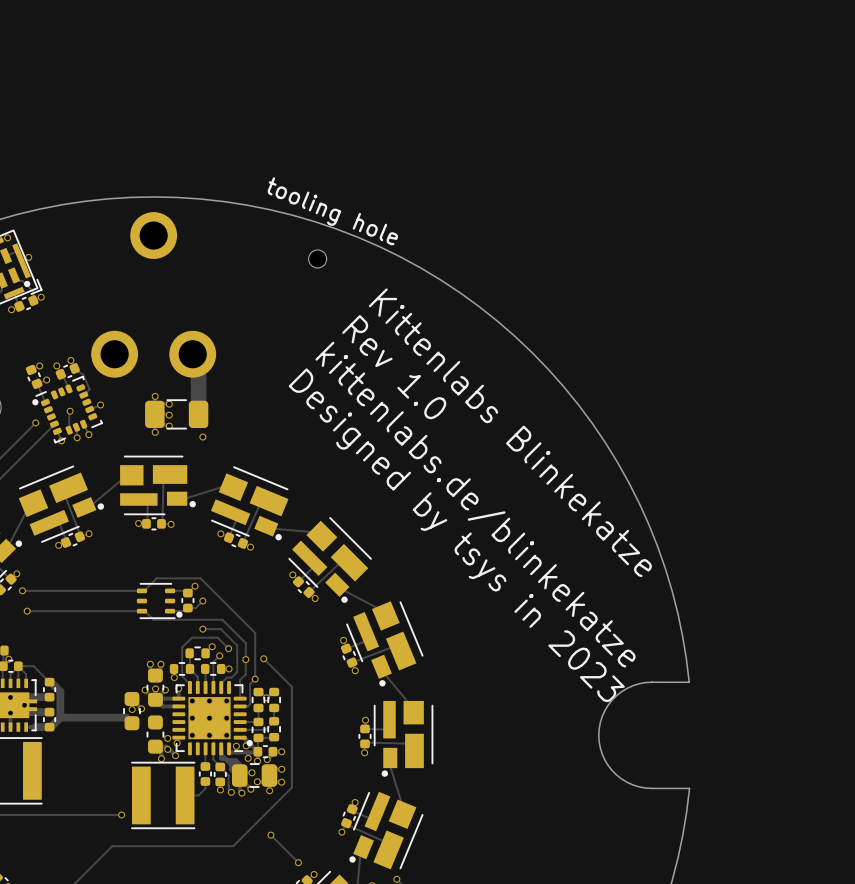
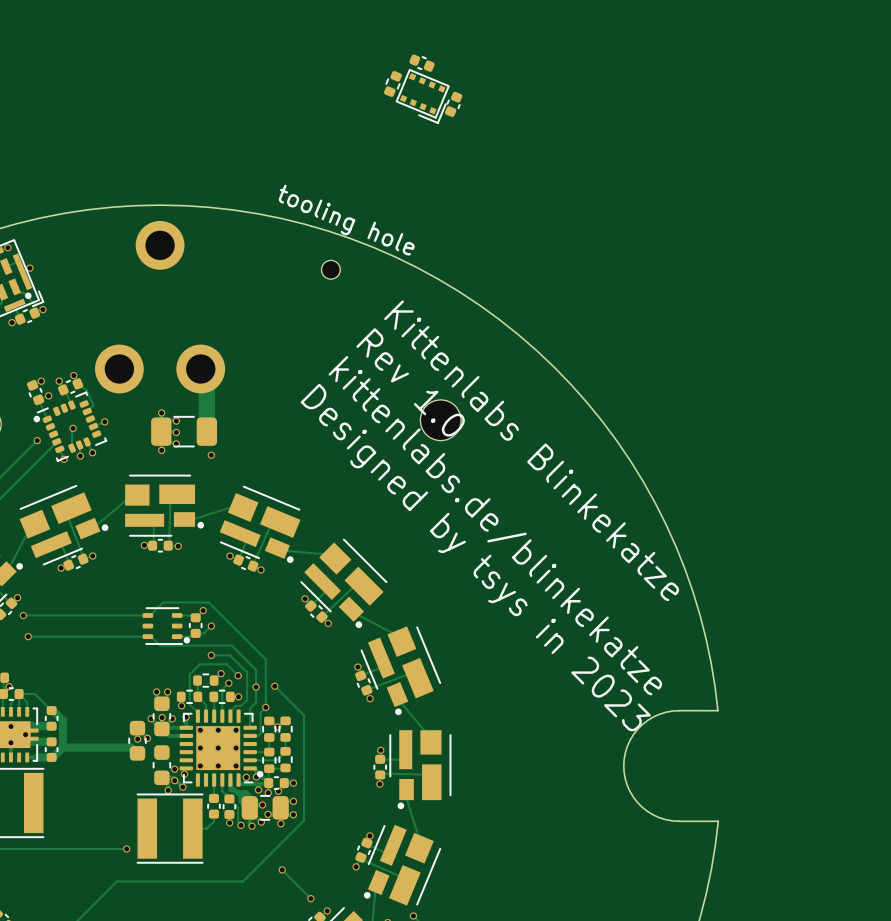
part: none -> (422, 63)
part: none -> (392, 83)
part: none -> (422, 96)
part: none -> (453, 104)
part: none -> (440, 420)

